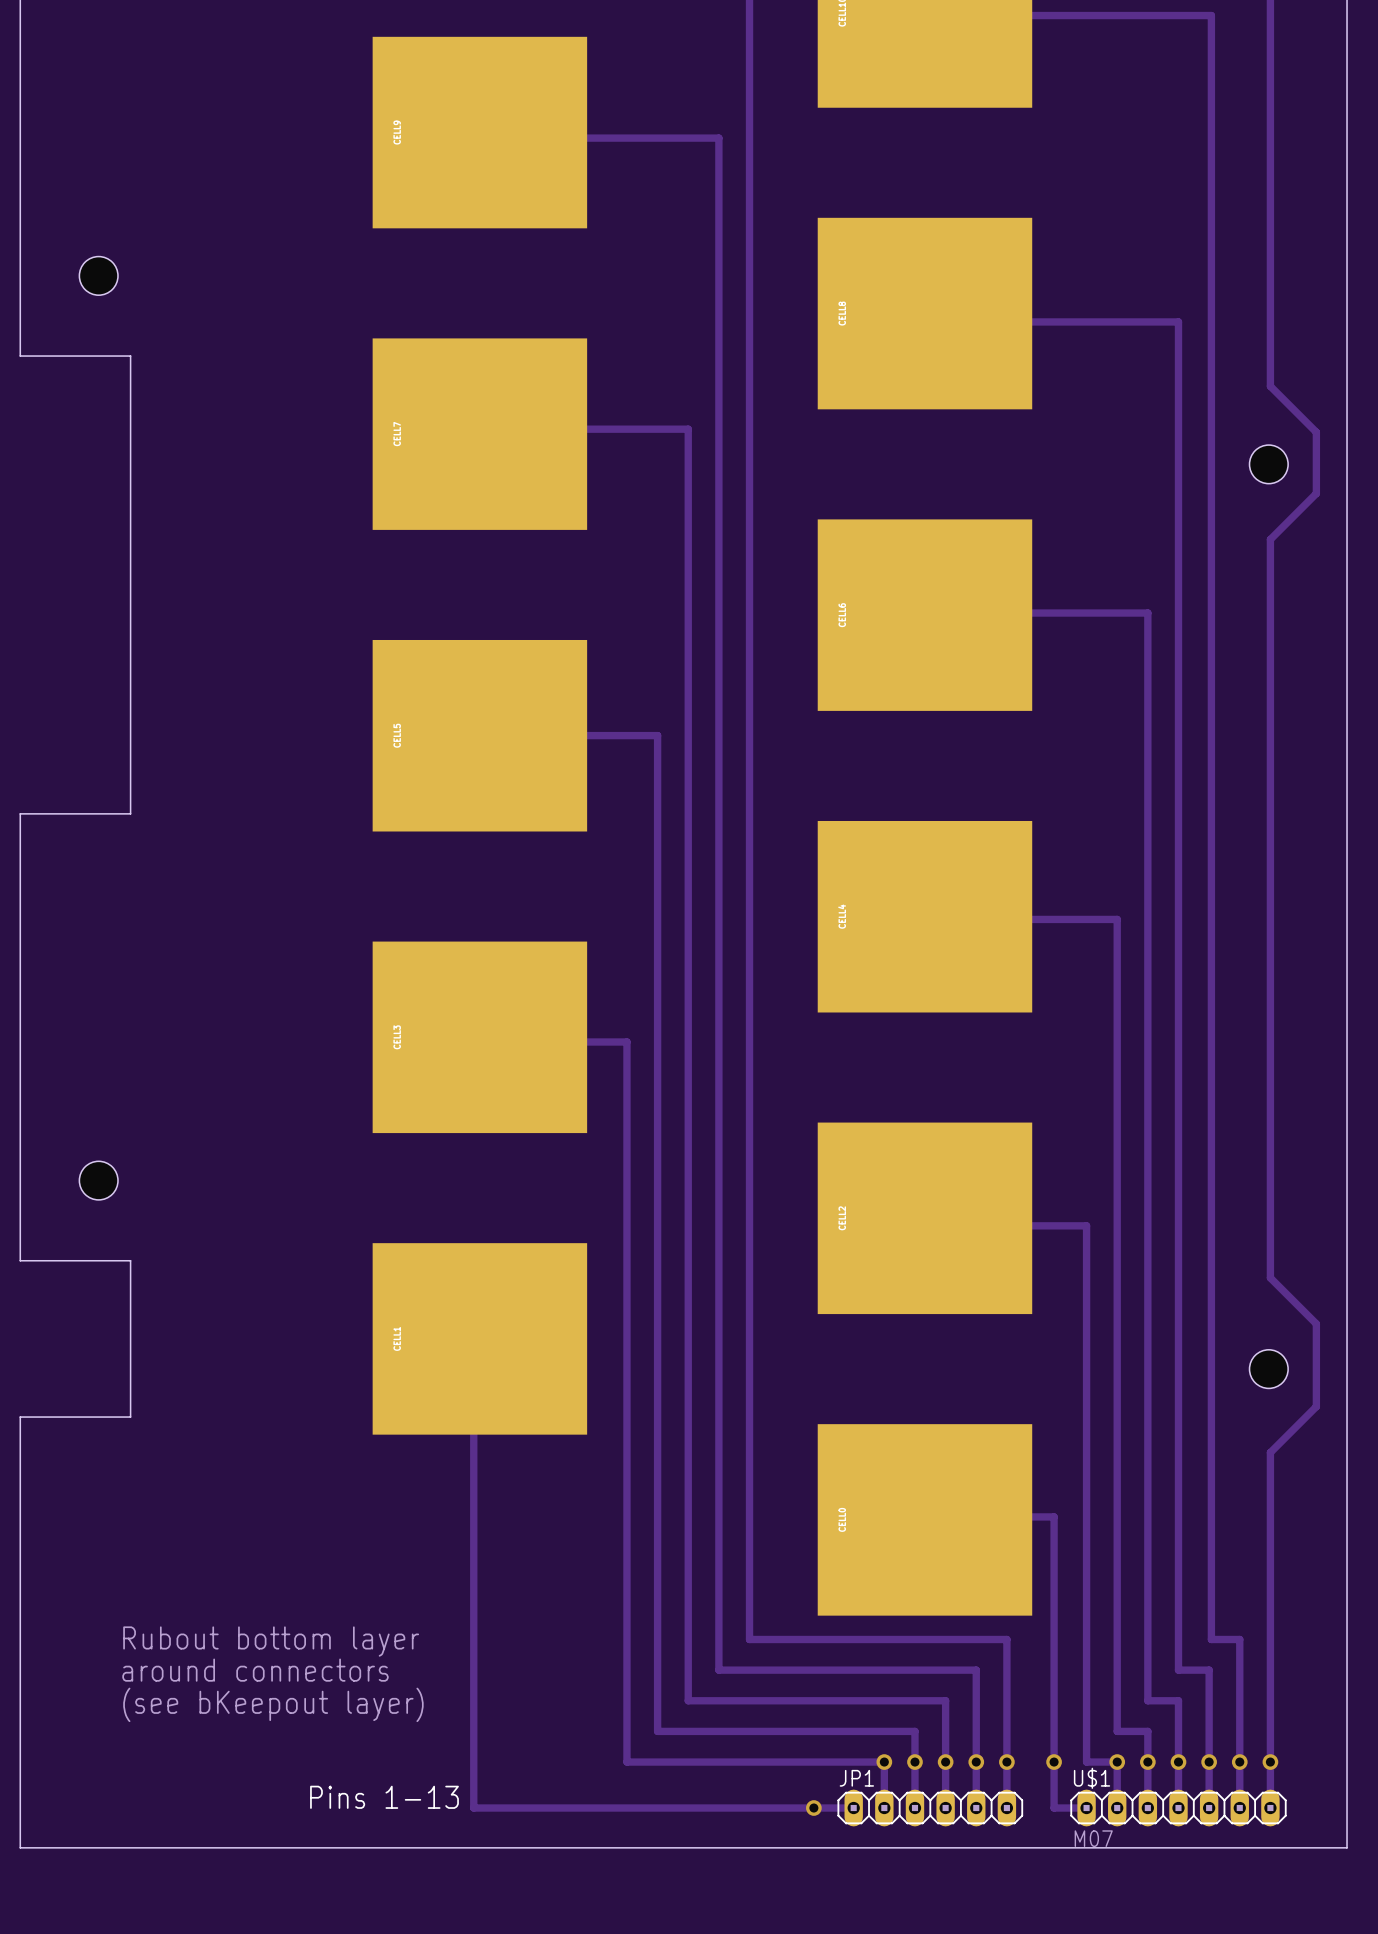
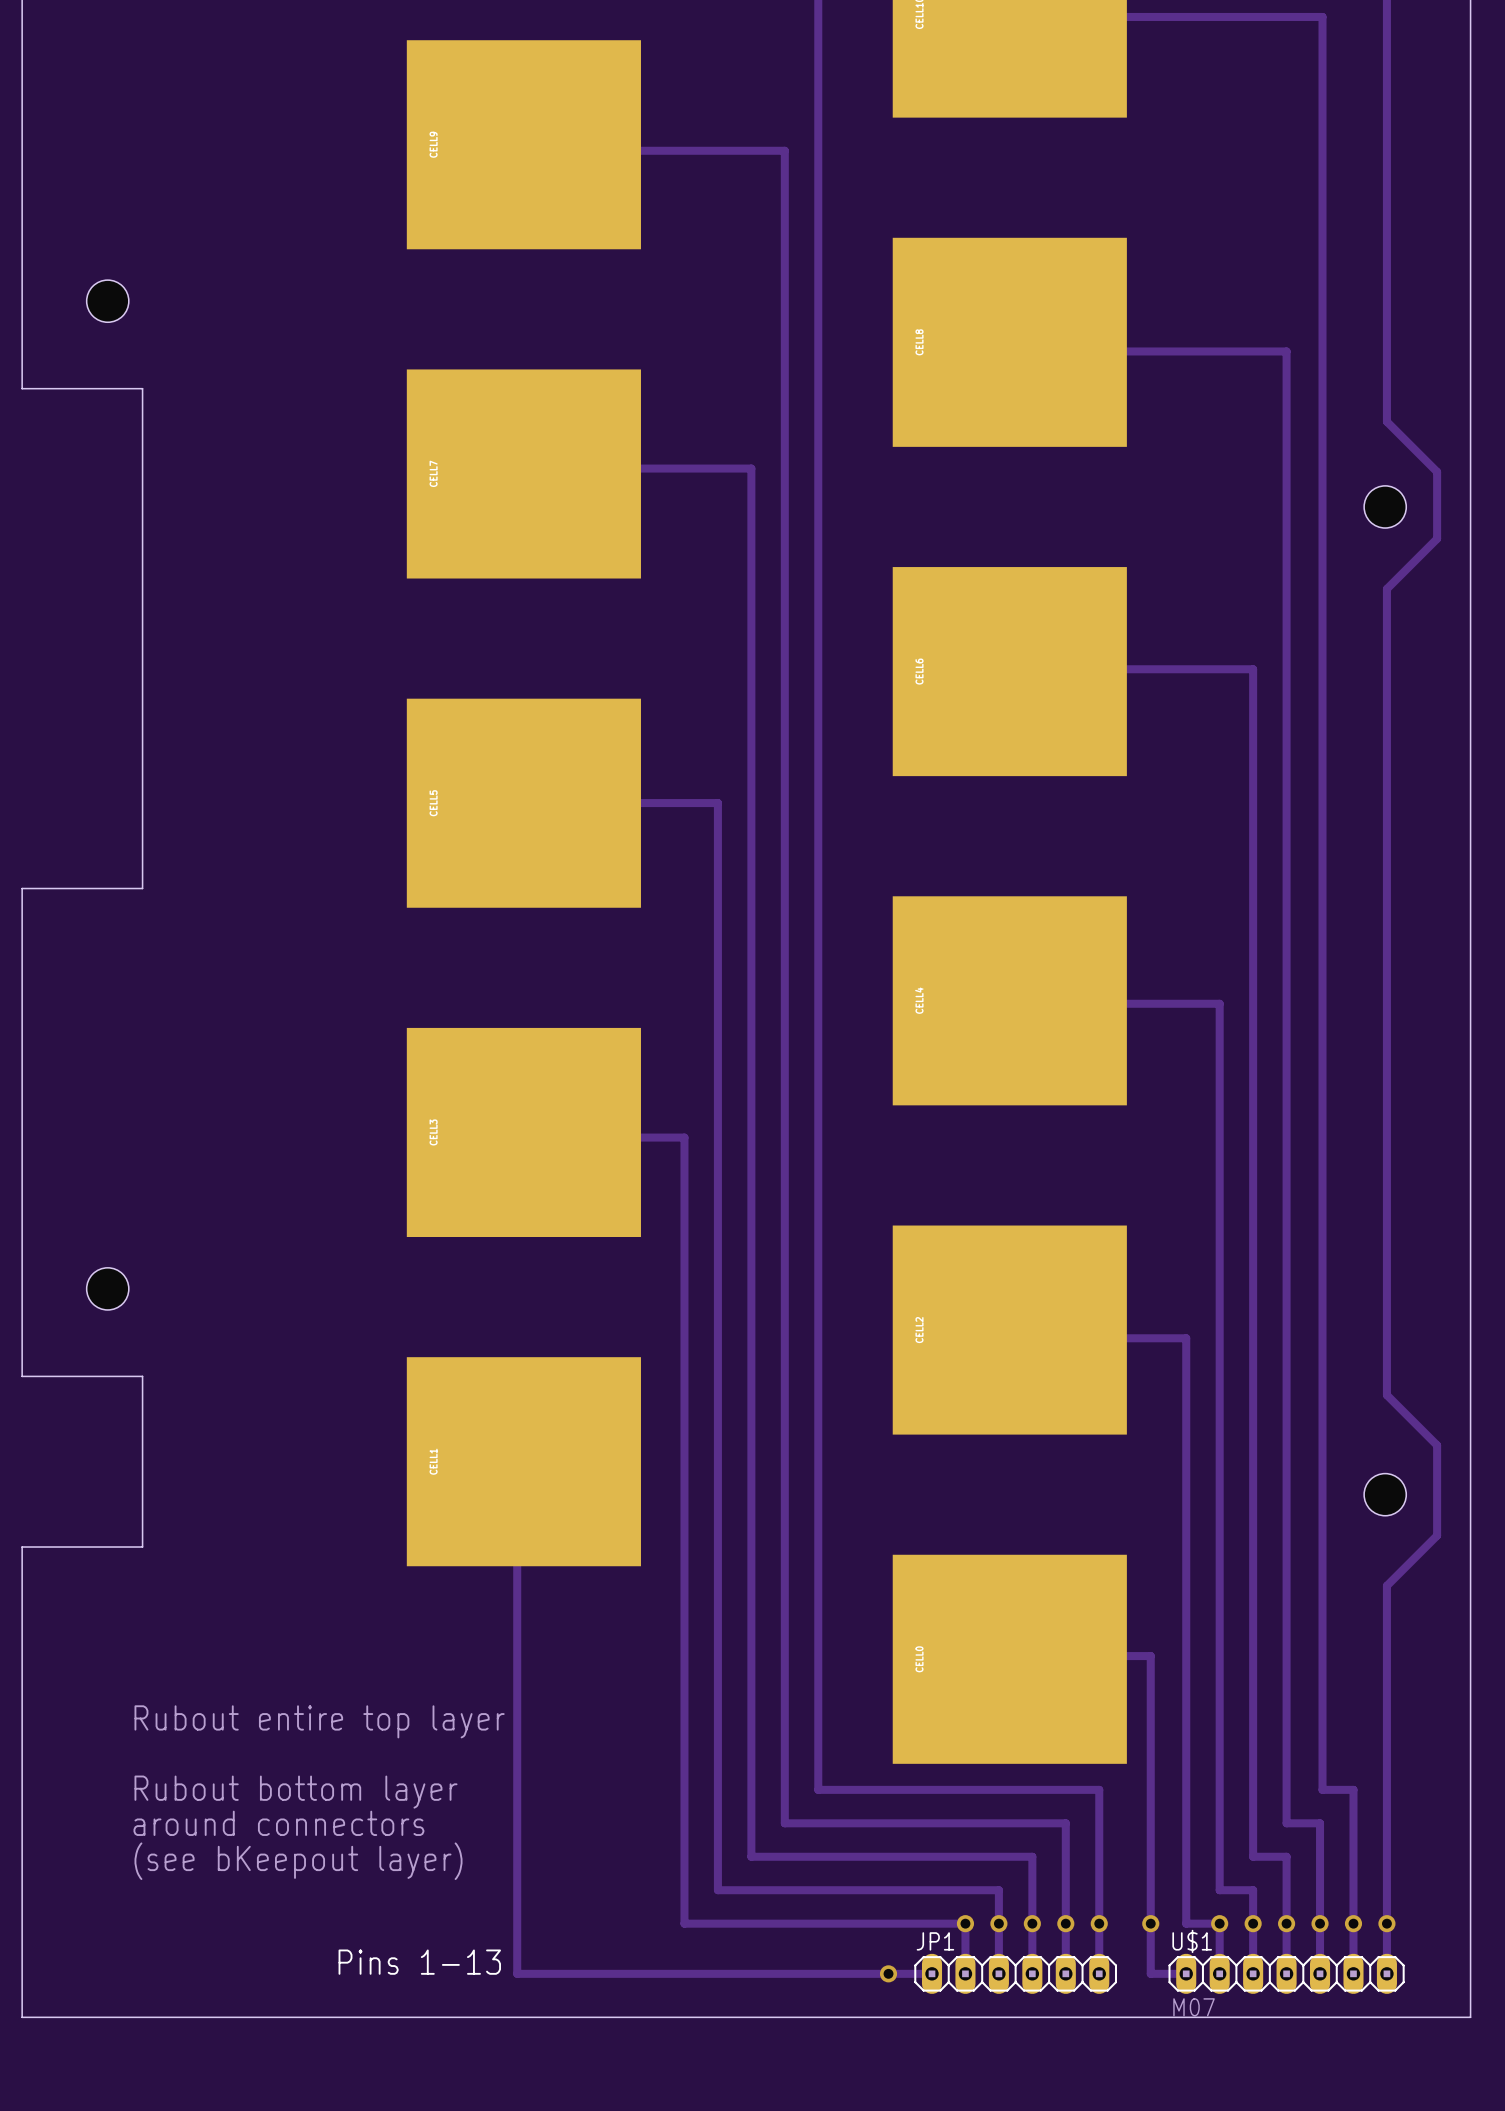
text: none -> Rubout entire top layer (319, 1721)

